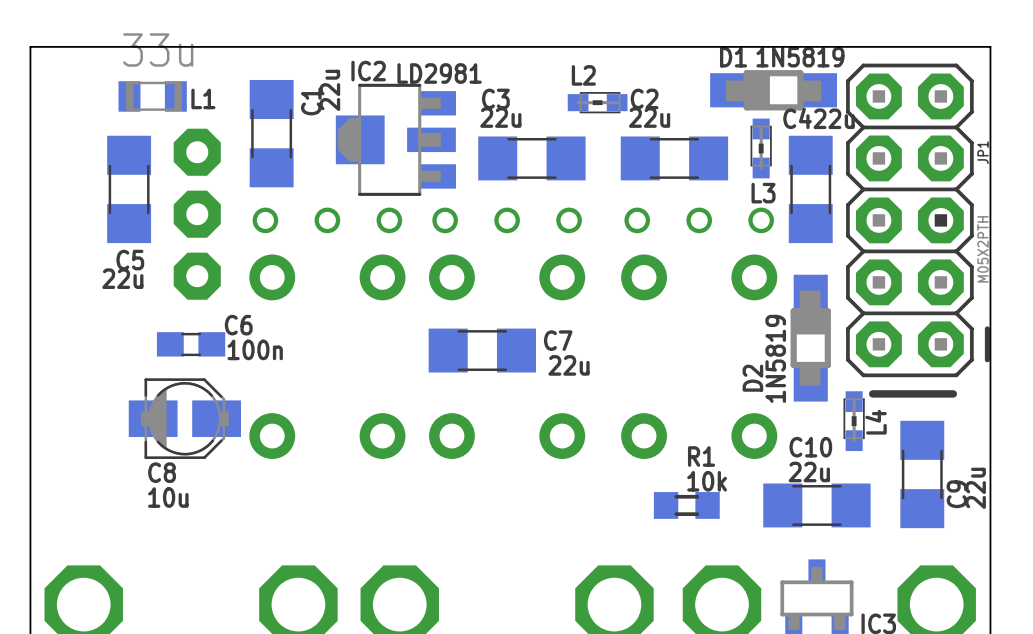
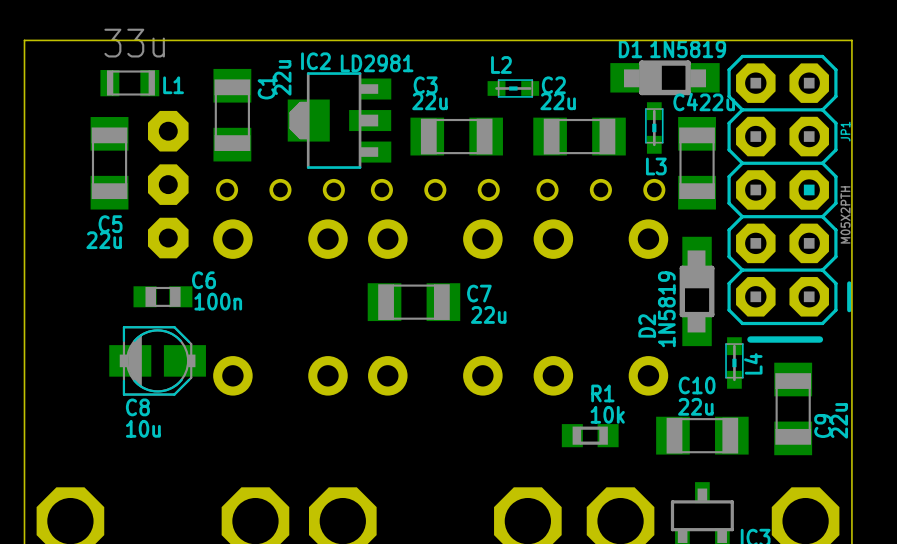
C1 footprint: [249, 79, 294, 188] -> [213, 68, 252, 162]
C5 footprint: [107, 135, 152, 244] -> [90, 117, 129, 210]
C4 footprint: [788, 135, 833, 244] -> [678, 117, 716, 210]
C3 footprint: [478, 136, 586, 181] -> [410, 117, 503, 156]
C2 footprint: [620, 136, 729, 181] -> [533, 117, 626, 156]
C7 footprint: [428, 328, 536, 373] -> [367, 283, 461, 322]
C6 footprint: [156, 332, 226, 357] -> [133, 286, 193, 308]
C9 footprint: [900, 420, 945, 529] -> [774, 362, 813, 456]
C10 footprint: [763, 483, 871, 528] -> [656, 416, 749, 455]
R1 footprint: [653, 492, 720, 519] -> [561, 424, 619, 448]

